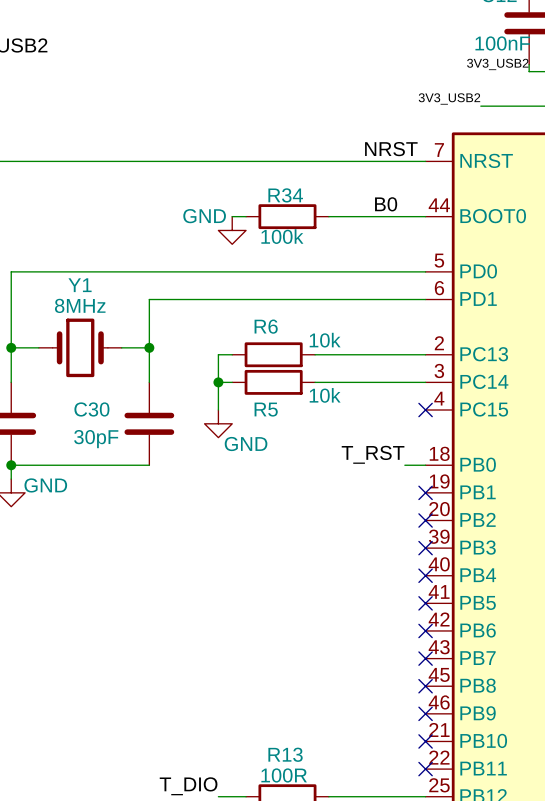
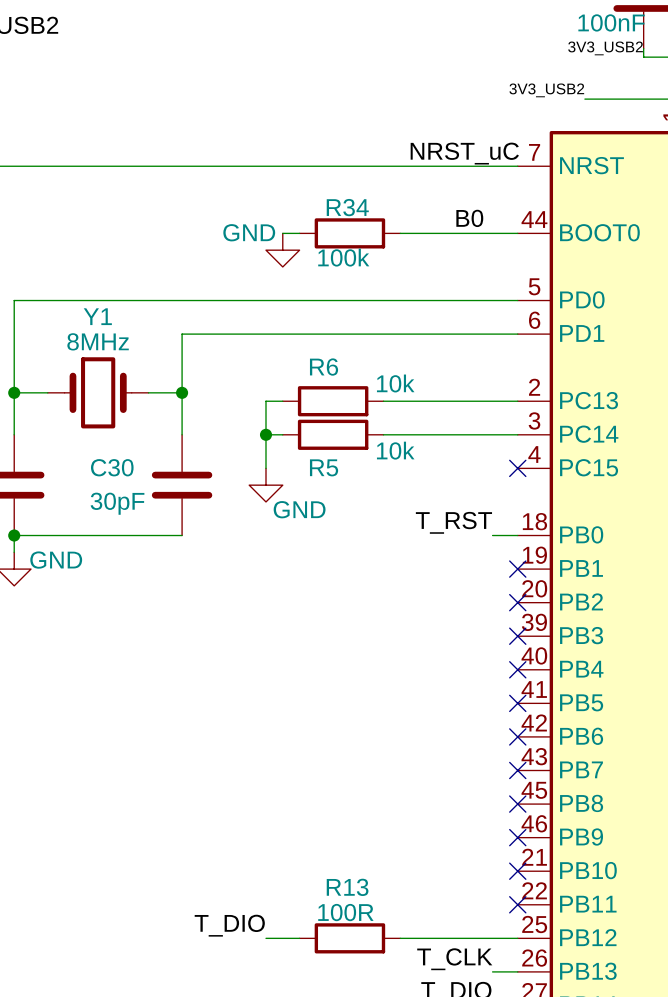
label: NRST (391, 149) -> NRST_uC (464, 153)

